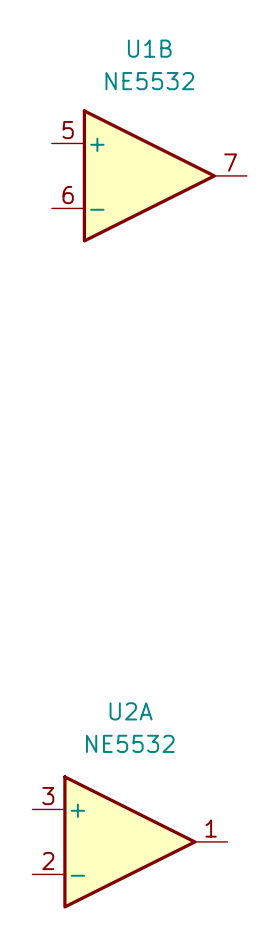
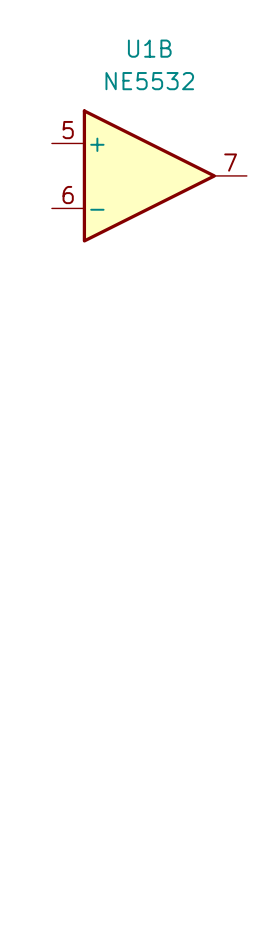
U2A: NE5532 (129, 841) -> none

